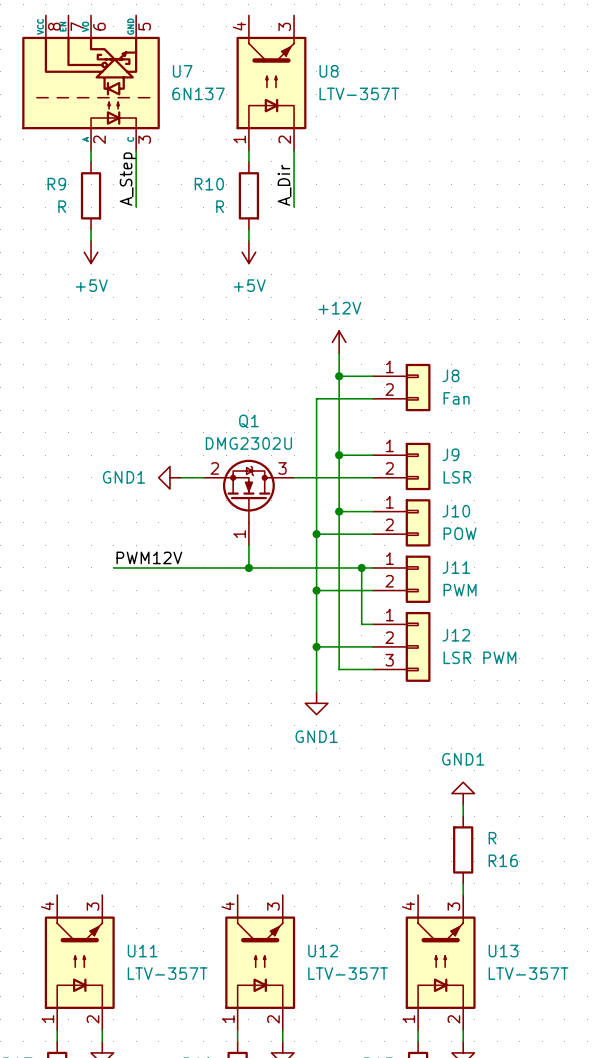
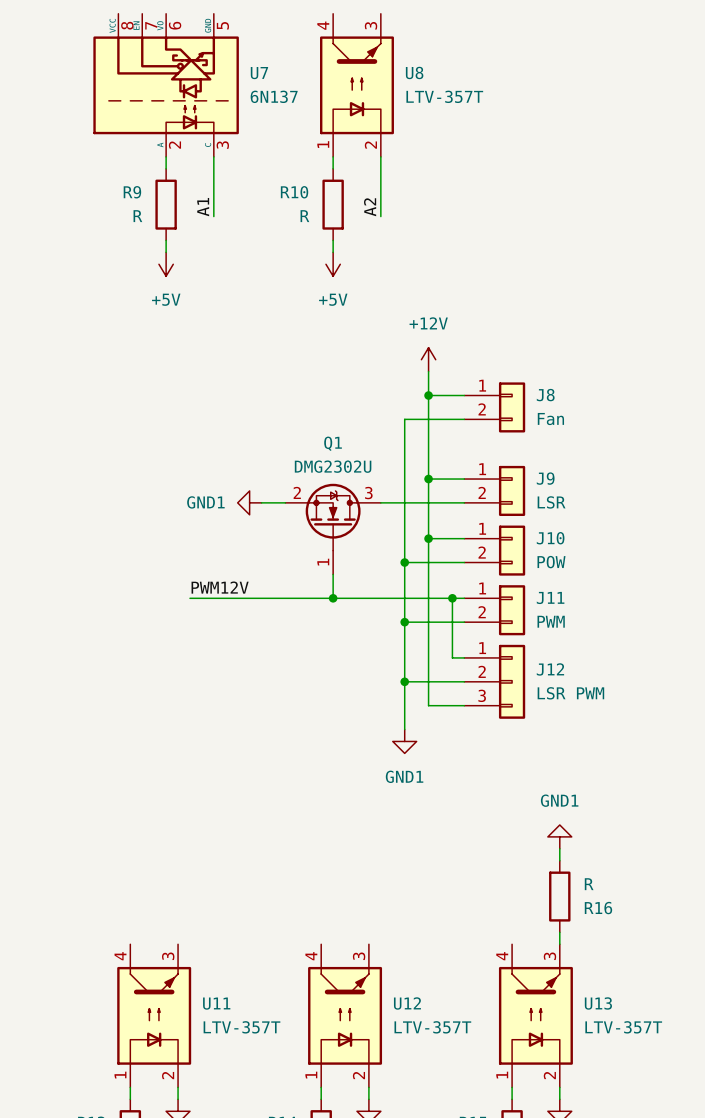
label: A_Step (127, 179) -> A1 (203, 207)
label: A_Dir (284, 185) -> A2 (370, 207)

